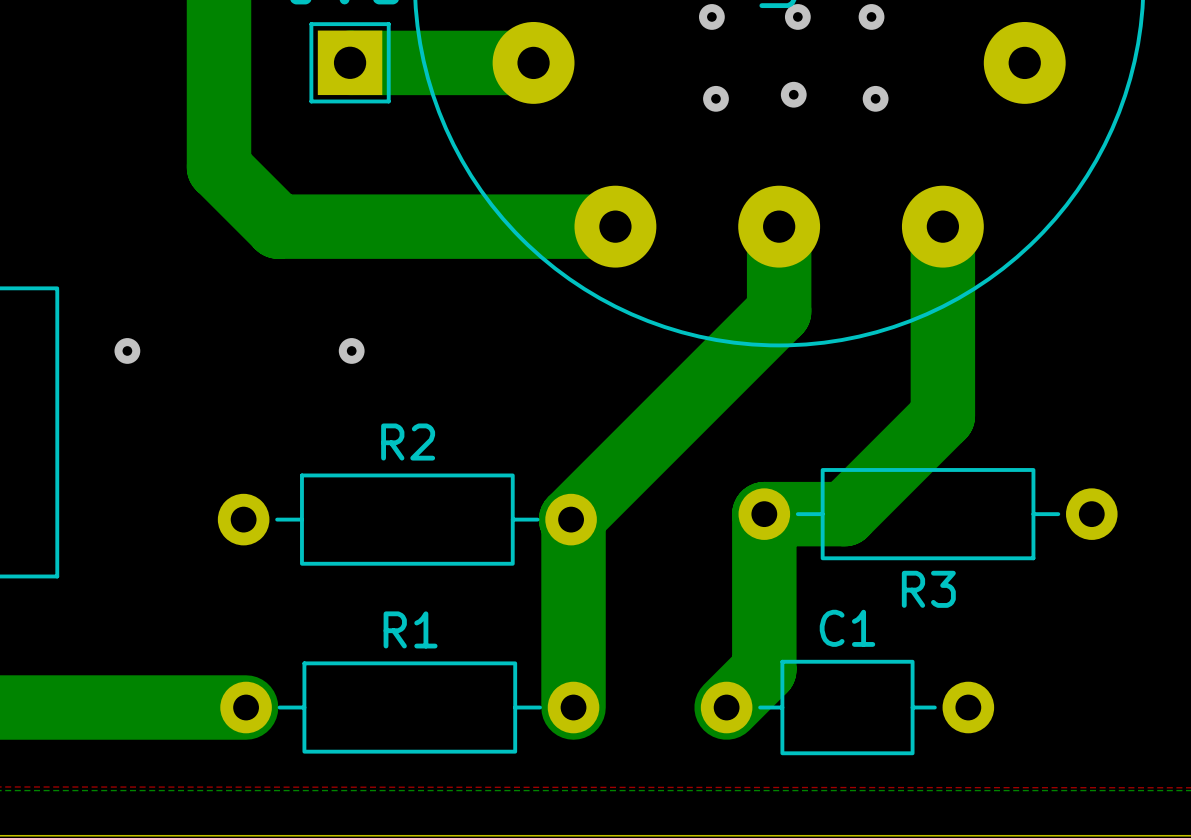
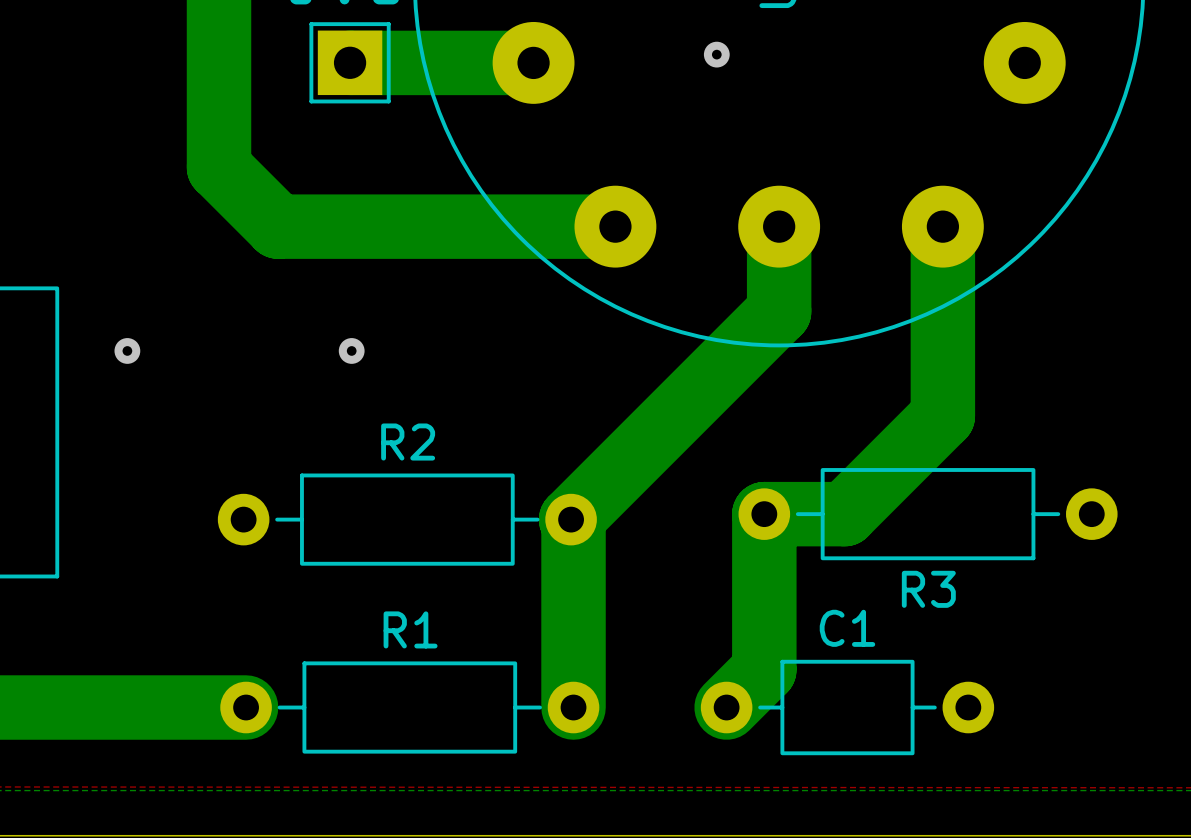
via: (711, 16) -> none
via: (797, 16) -> none
via: (871, 16) -> none
via: none -> (716, 54)
via: (793, 94) -> none
via: (715, 98) -> none
via: (875, 98) -> none

